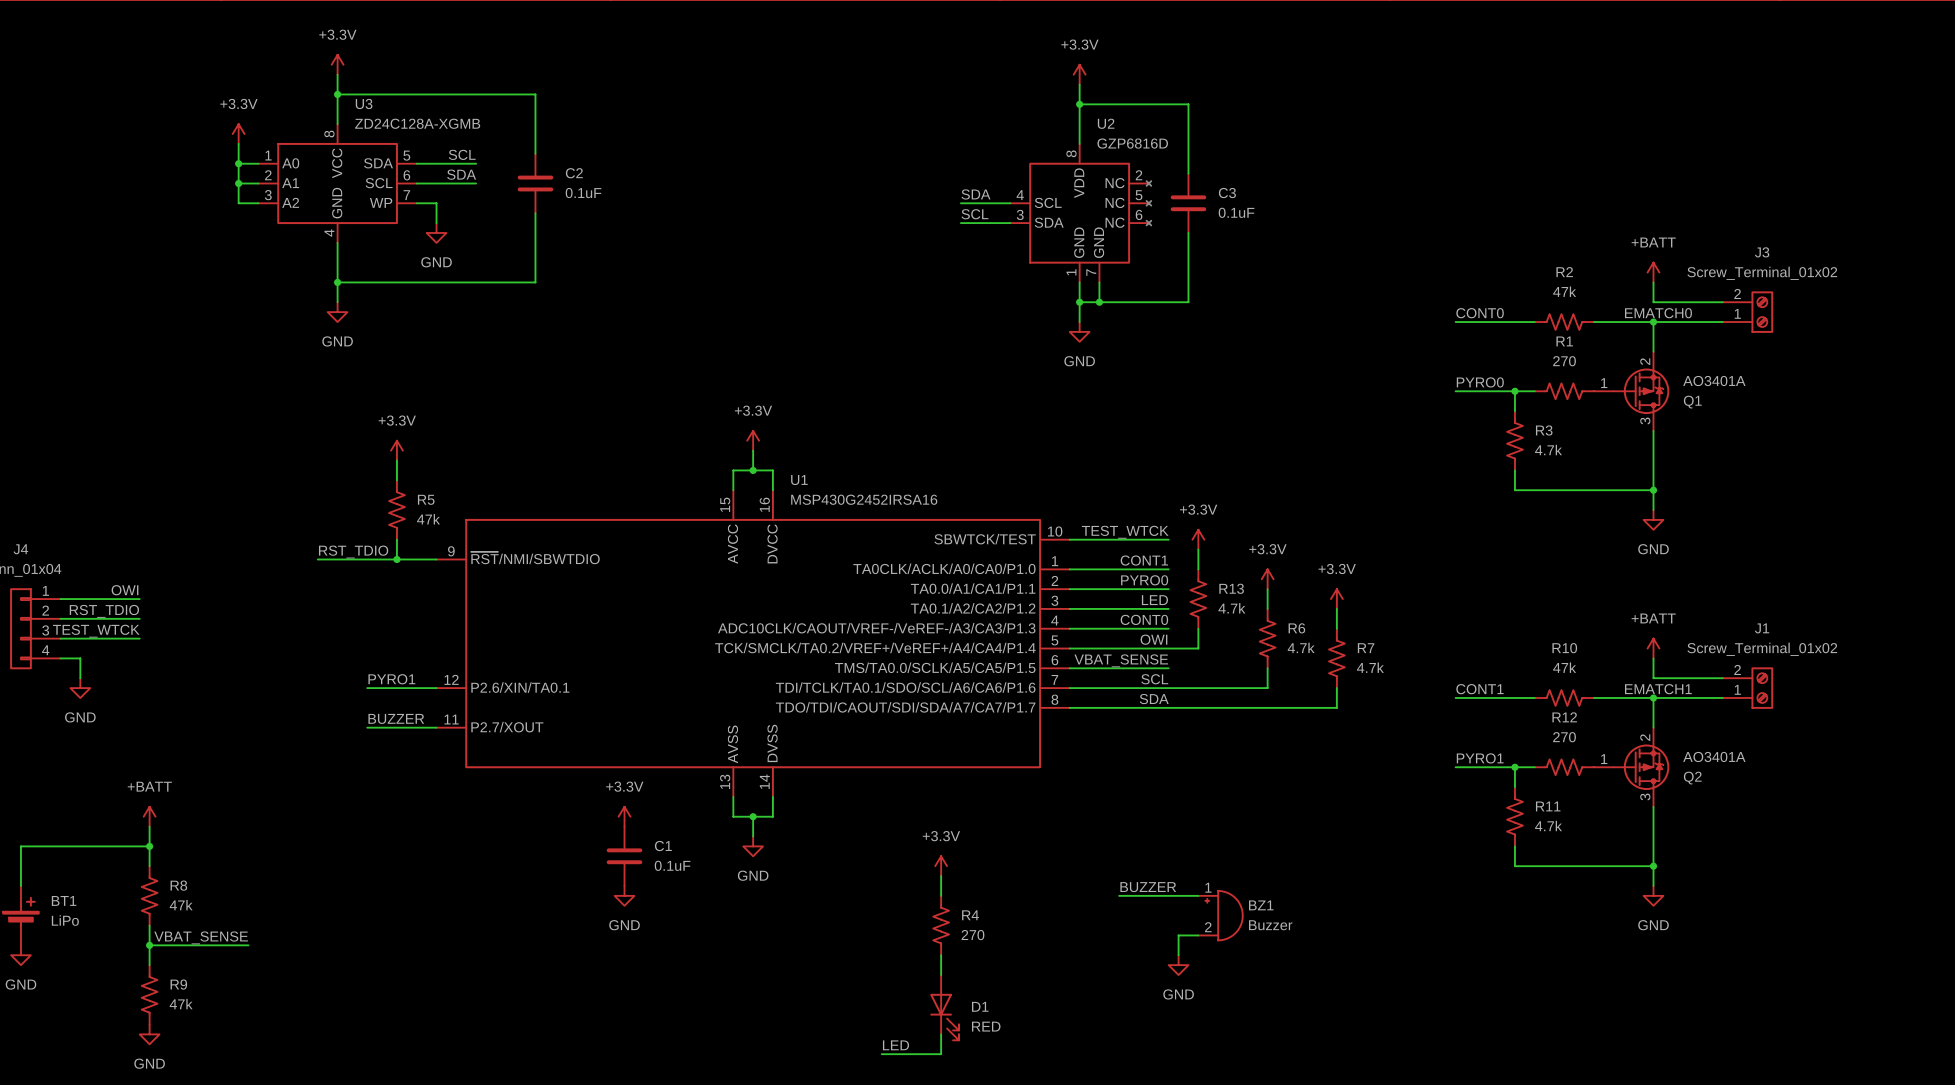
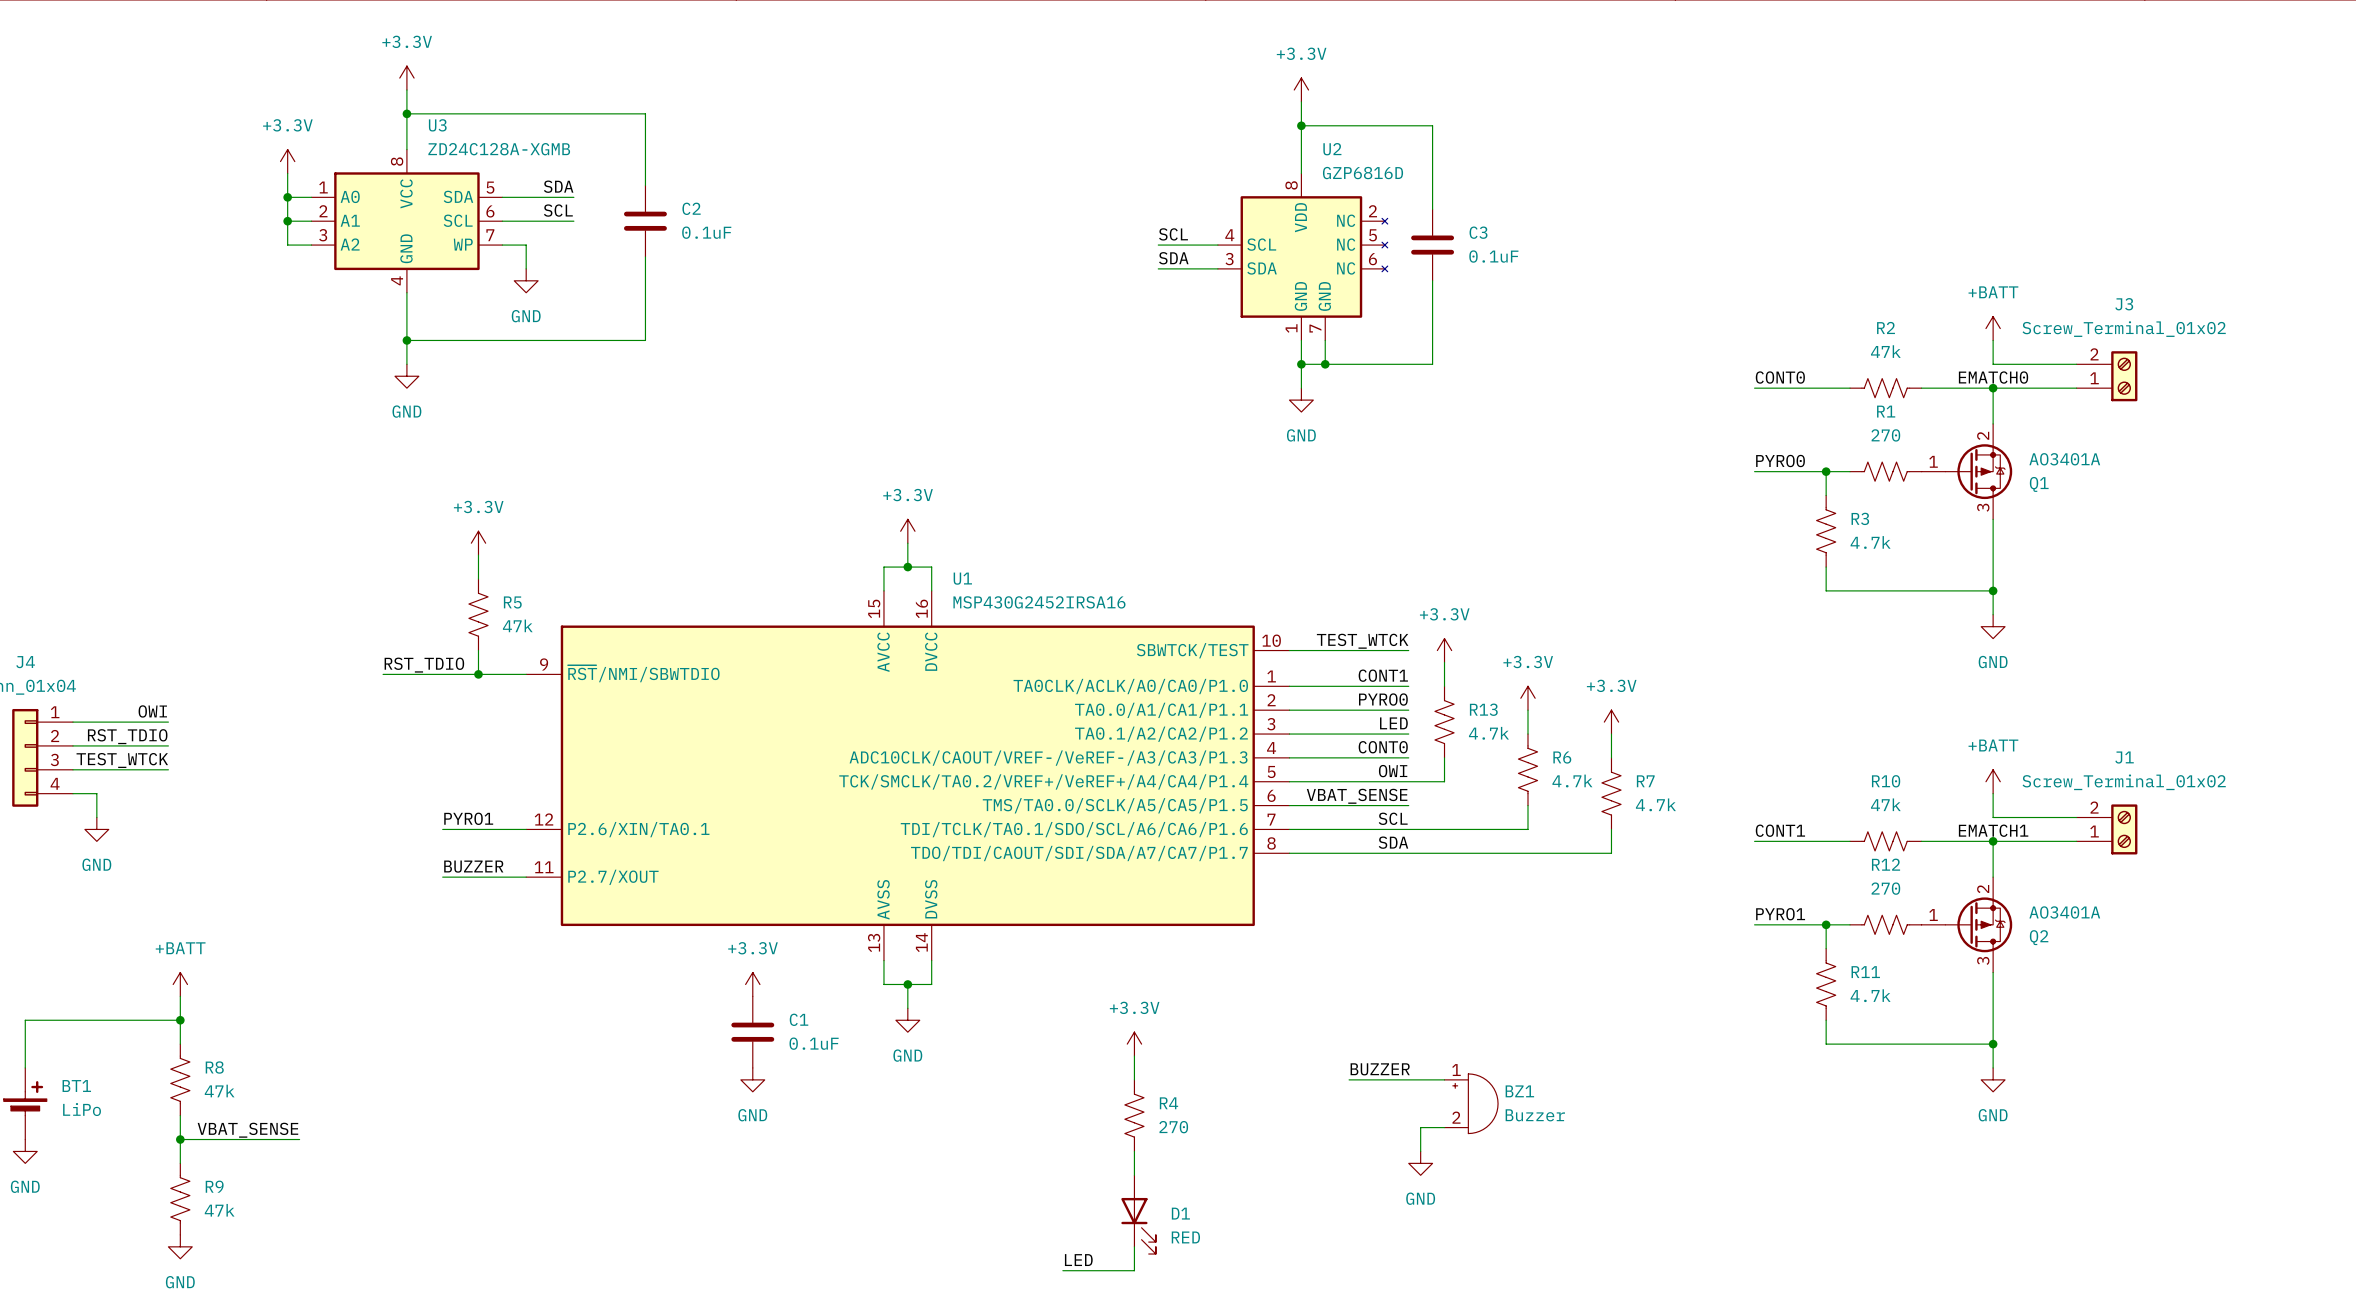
label: SCL (462, 154) -> SDA (558, 186)
label: SDA (461, 174) -> SCL (558, 210)
label: SDA (976, 194) -> SCL (1173, 234)
label: SCL (974, 214) -> SDA (1173, 258)

